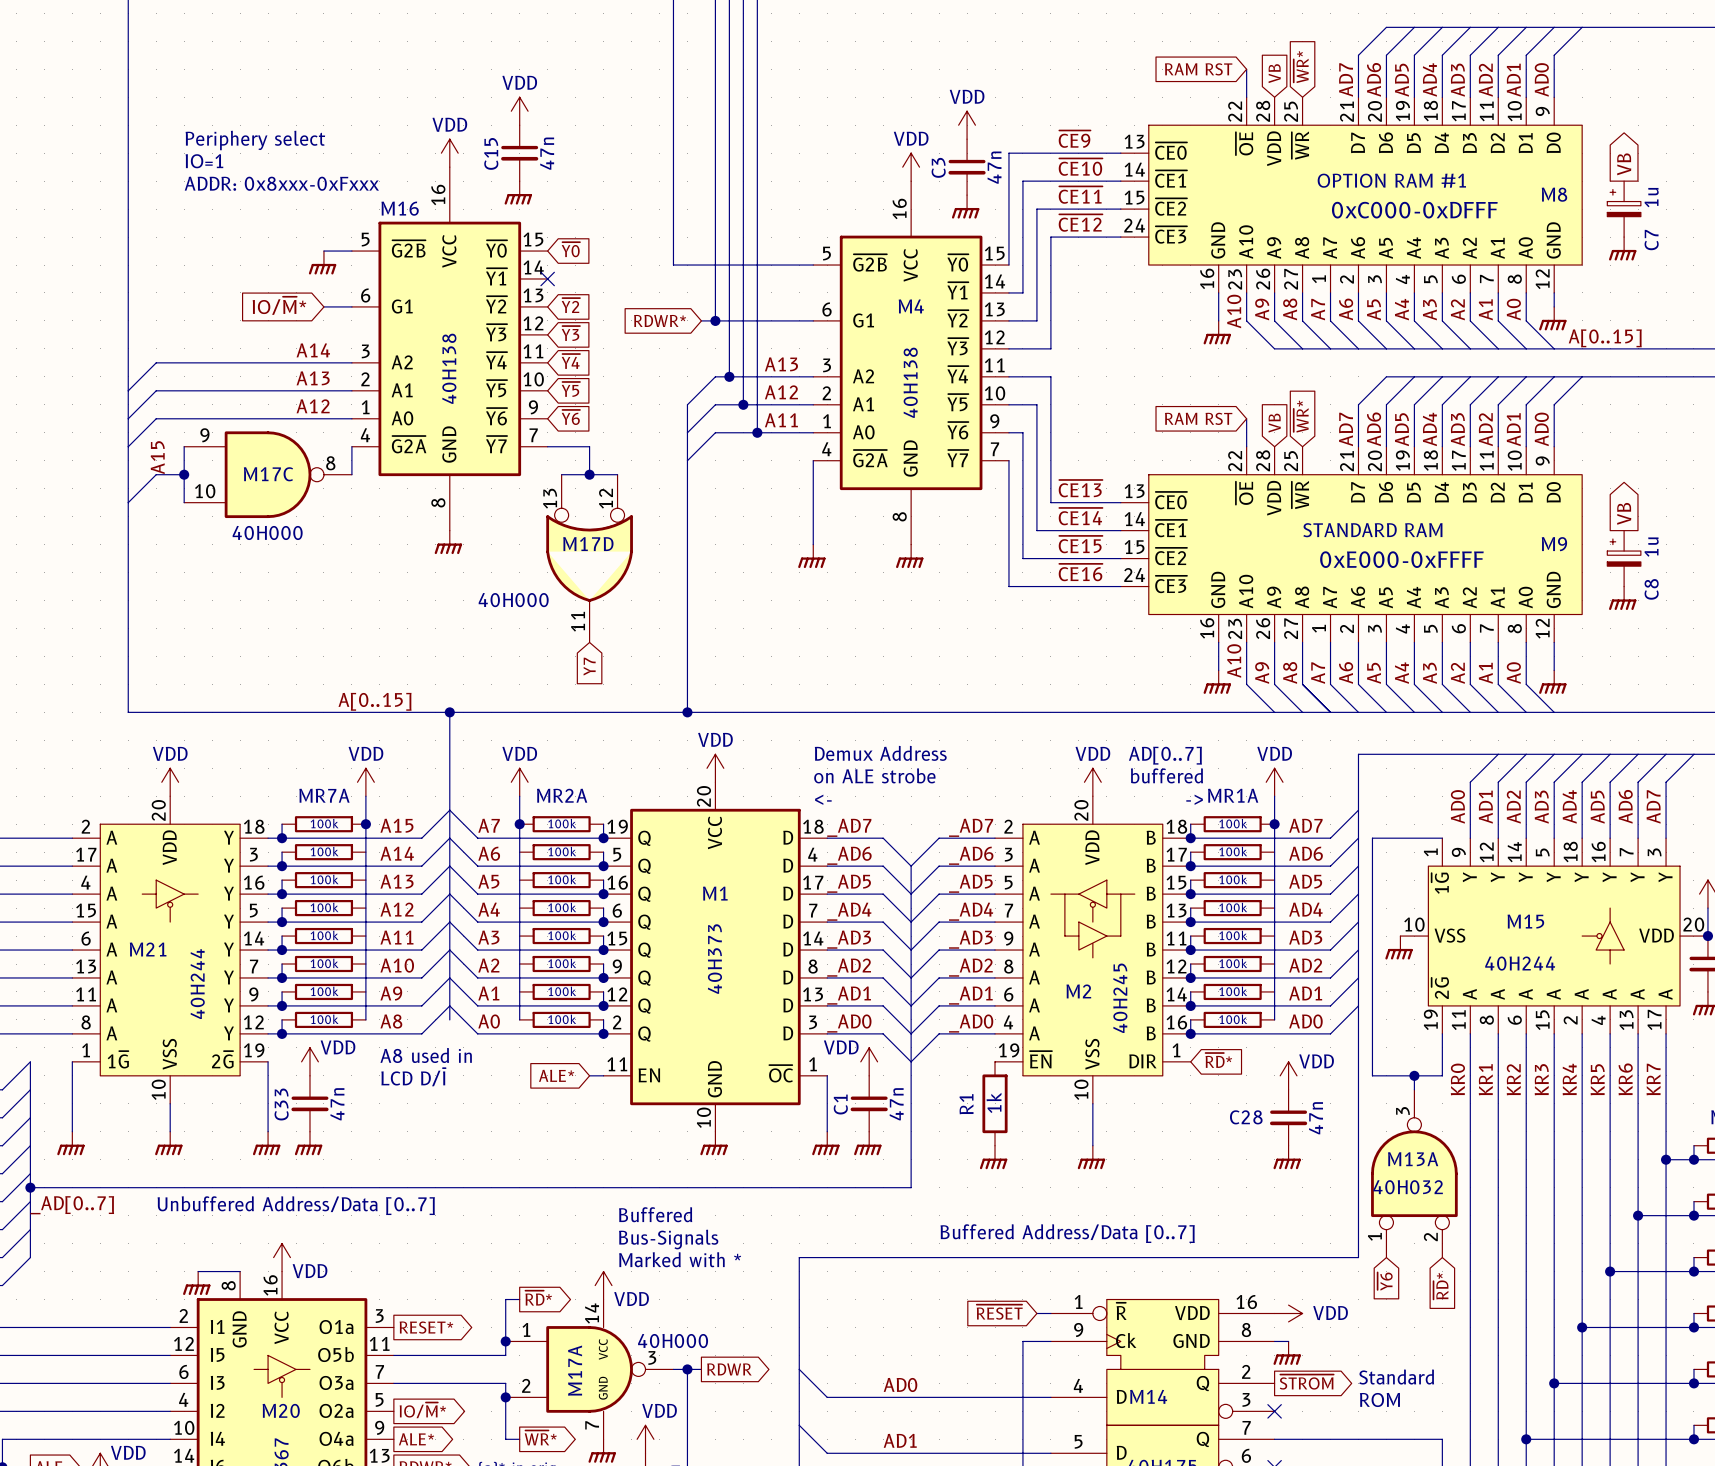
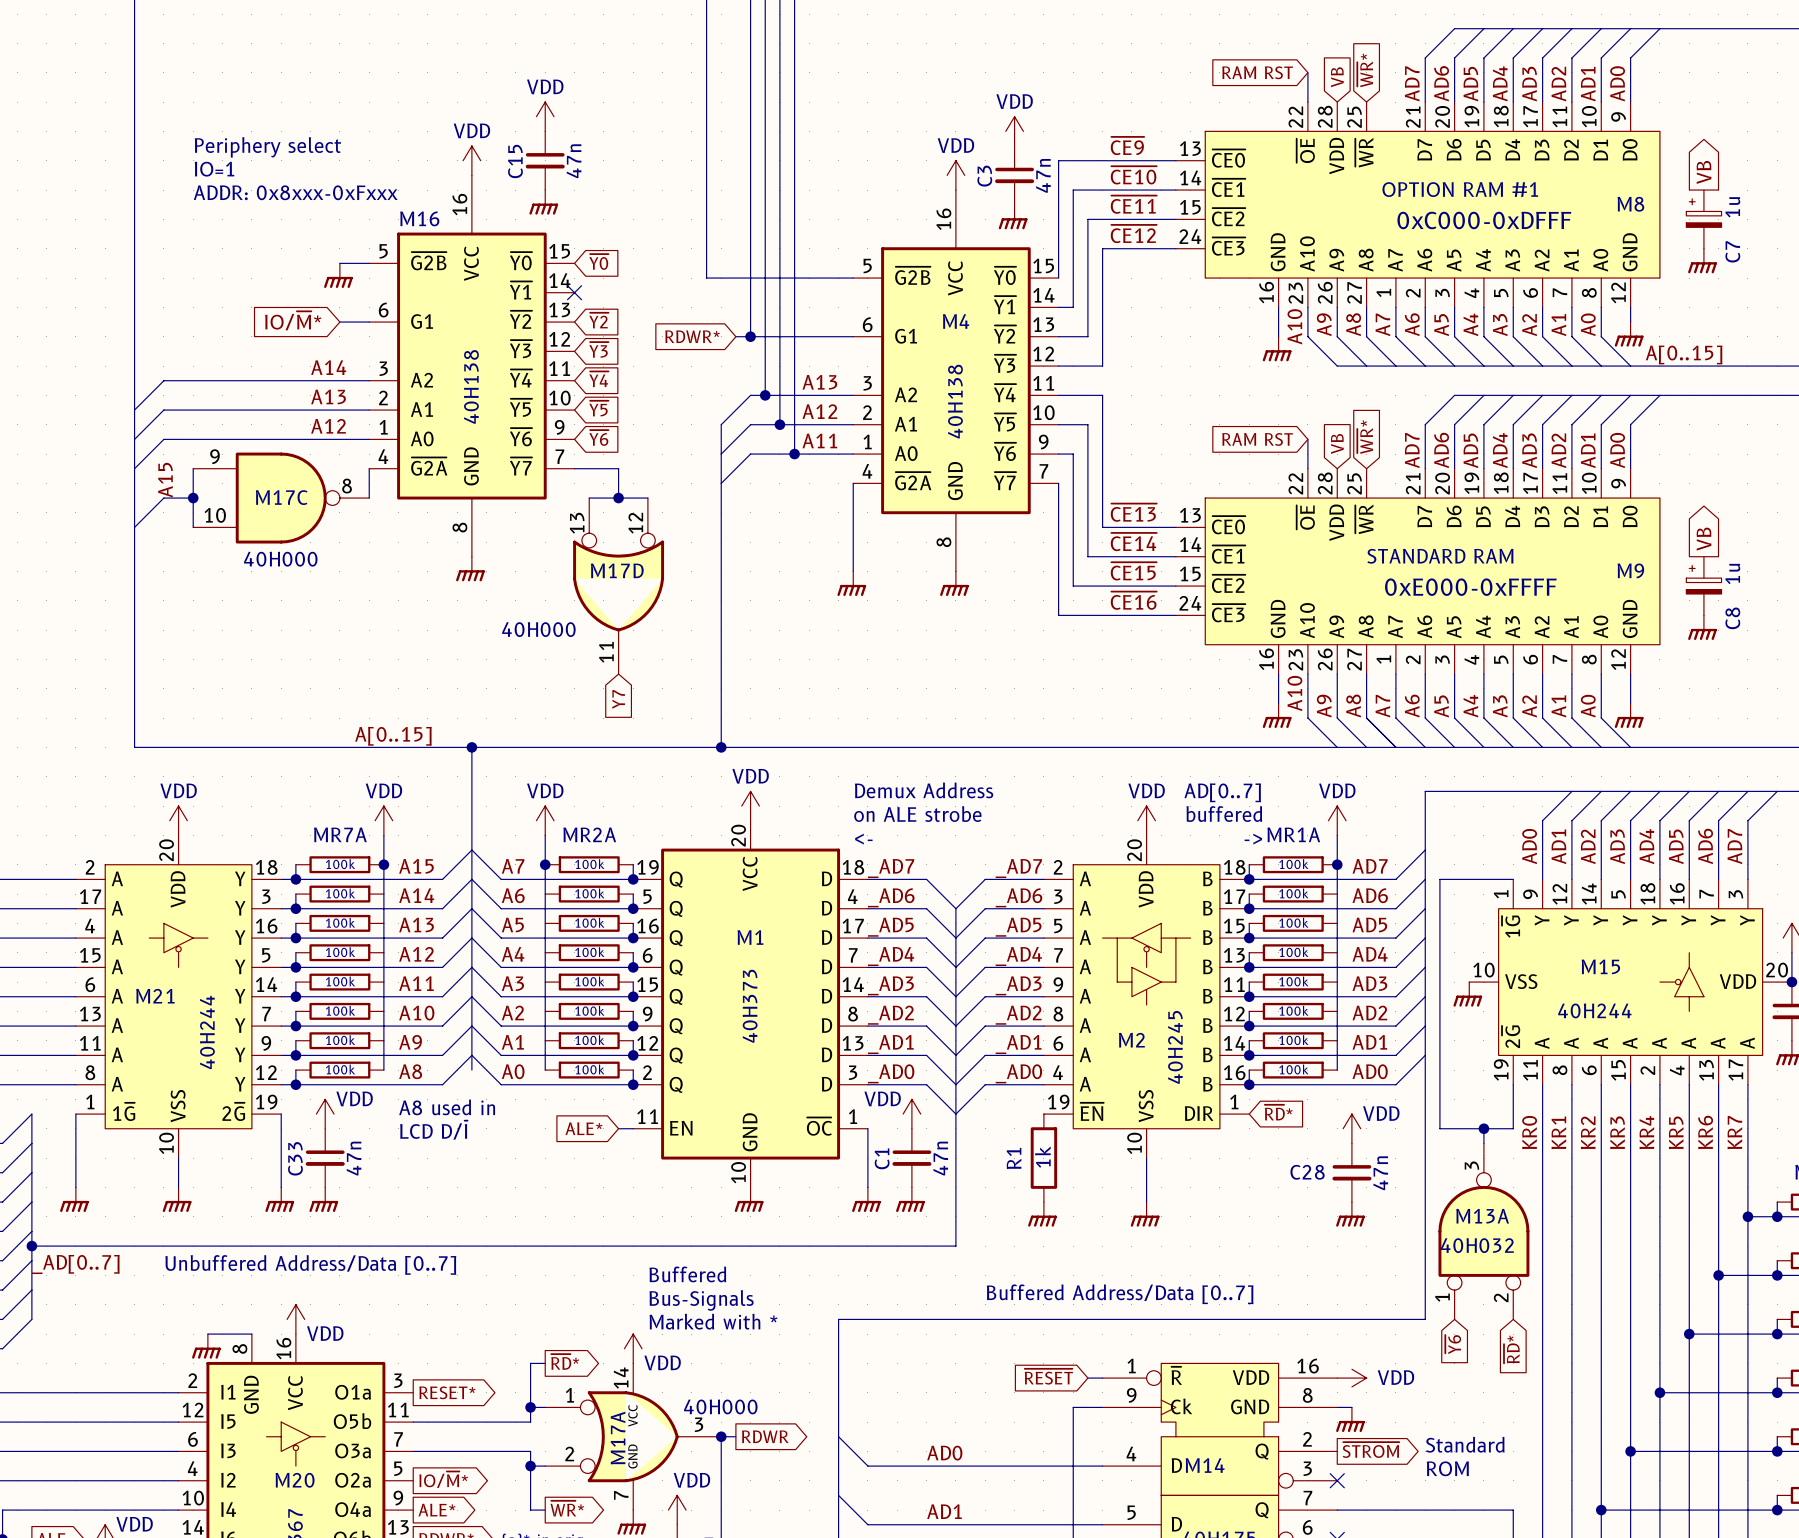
M17A symbol: [505, 1326, 674, 1413] -> [545, 1391, 722, 1483]

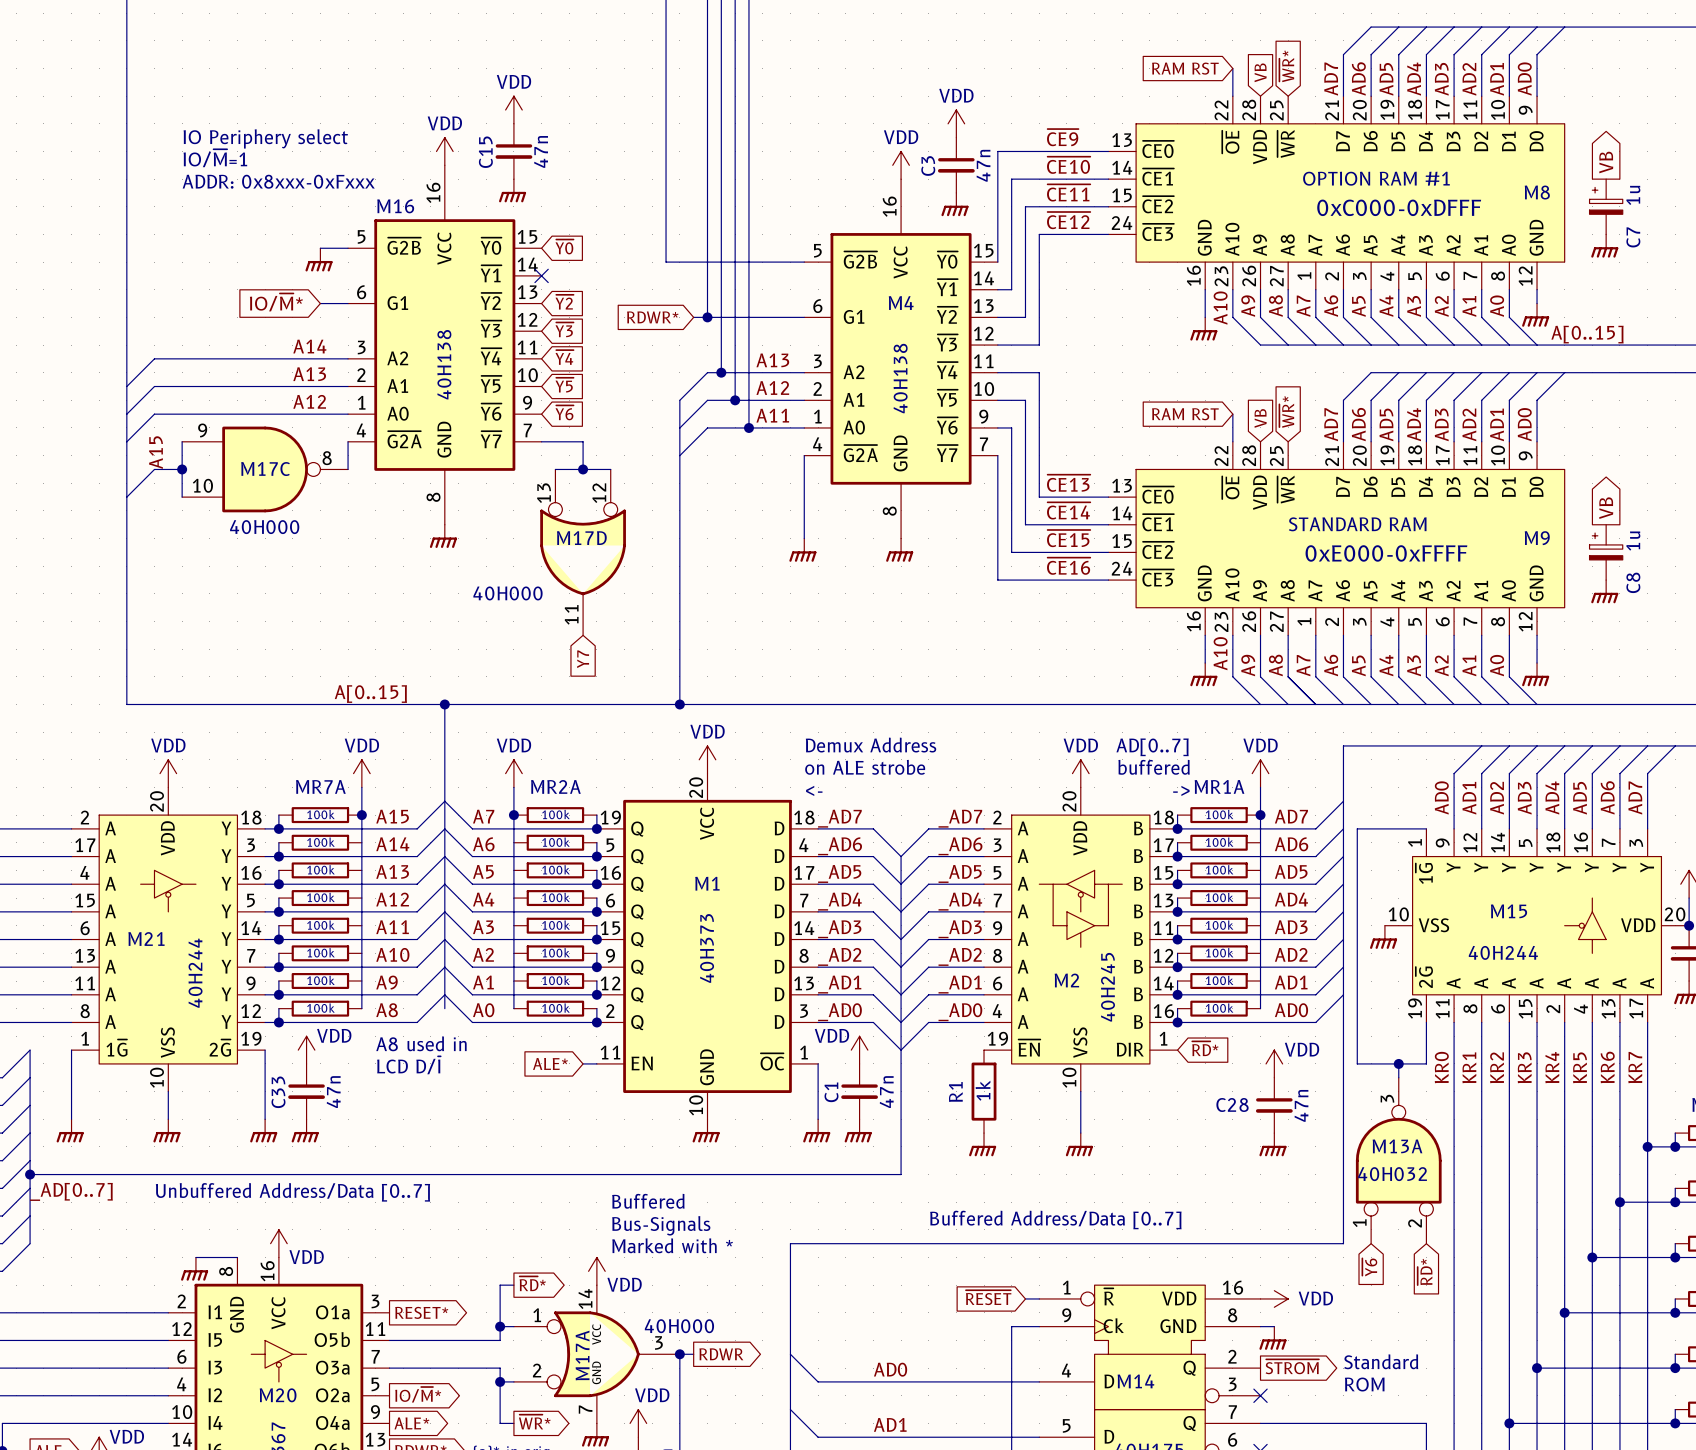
text: Periphery select (267, 147) -> IO Periphery select (265, 138)
text: IO=1 (214, 169) -> IO/~{M}=1 (215, 158)

